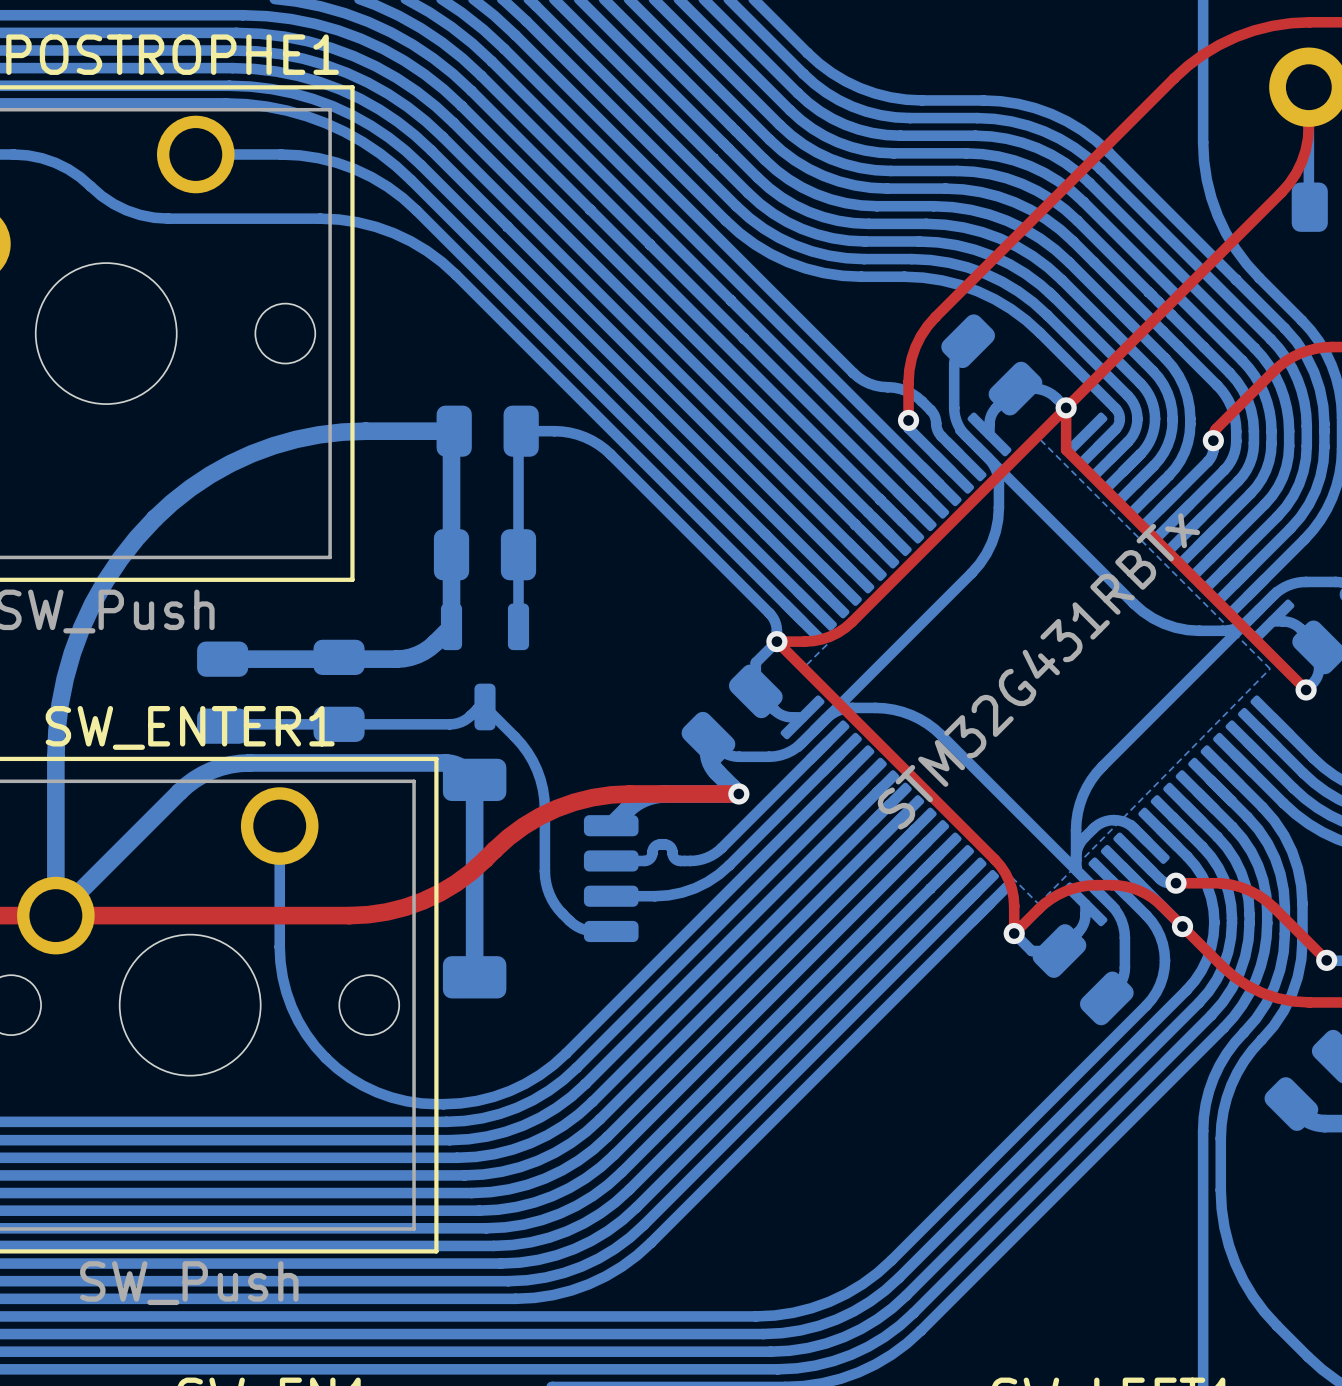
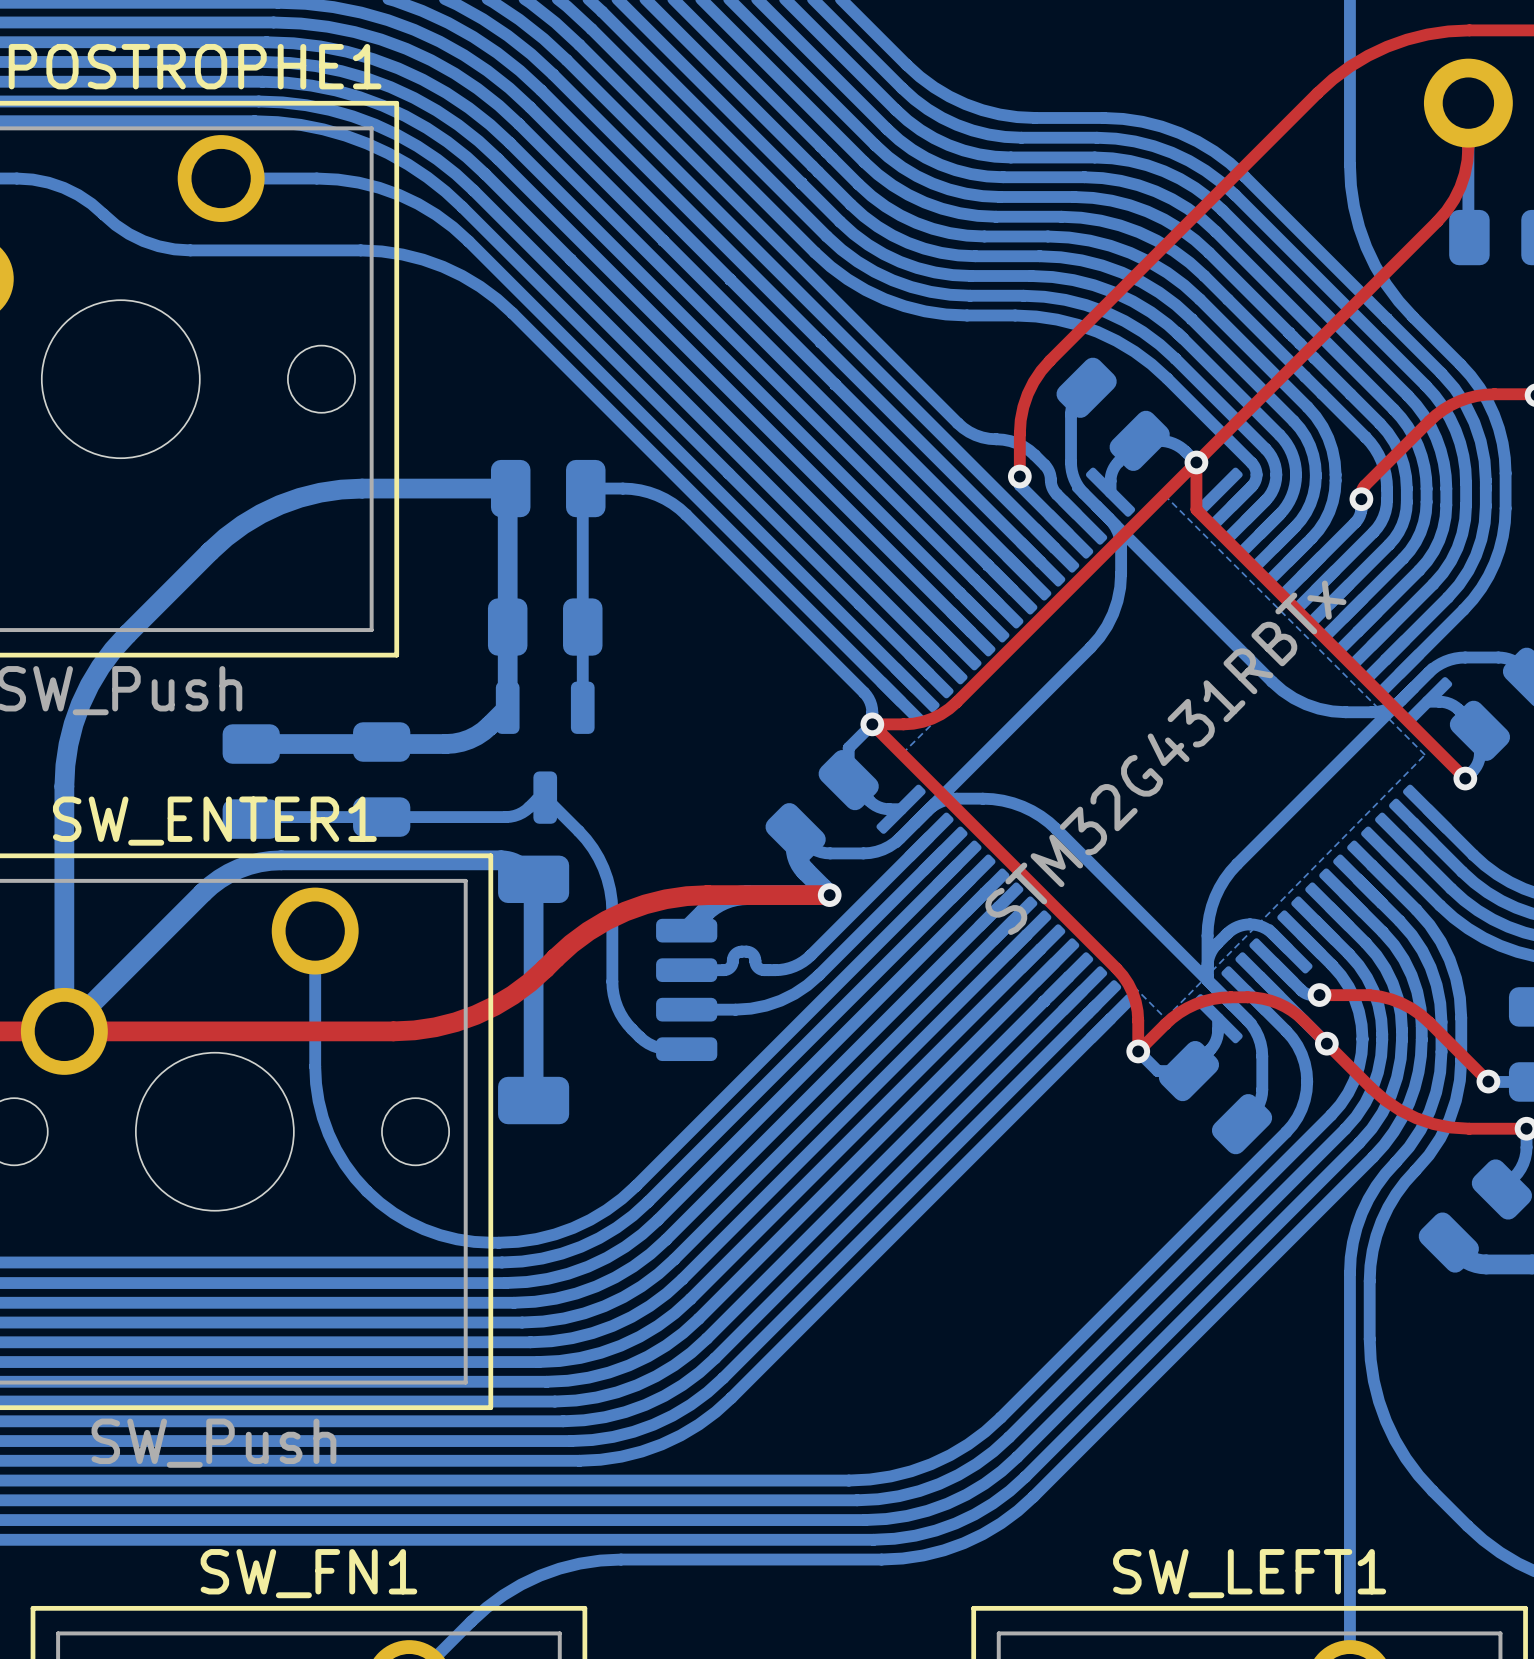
bottom track: (365, 431) (319, 434) (296, 439) (251, 453) (230, 463) (190, 488) (154, 518) (136, 538) (105, 580) (81, 628) (72, 653) (60, 704) (55, 757) -> (411, 488) (362, 488) (320, 492) (299, 497) (260, 513) (225, 537) (127, 634) (113, 650) (89, 685) (73, 723) (65, 765) (64, 854)

